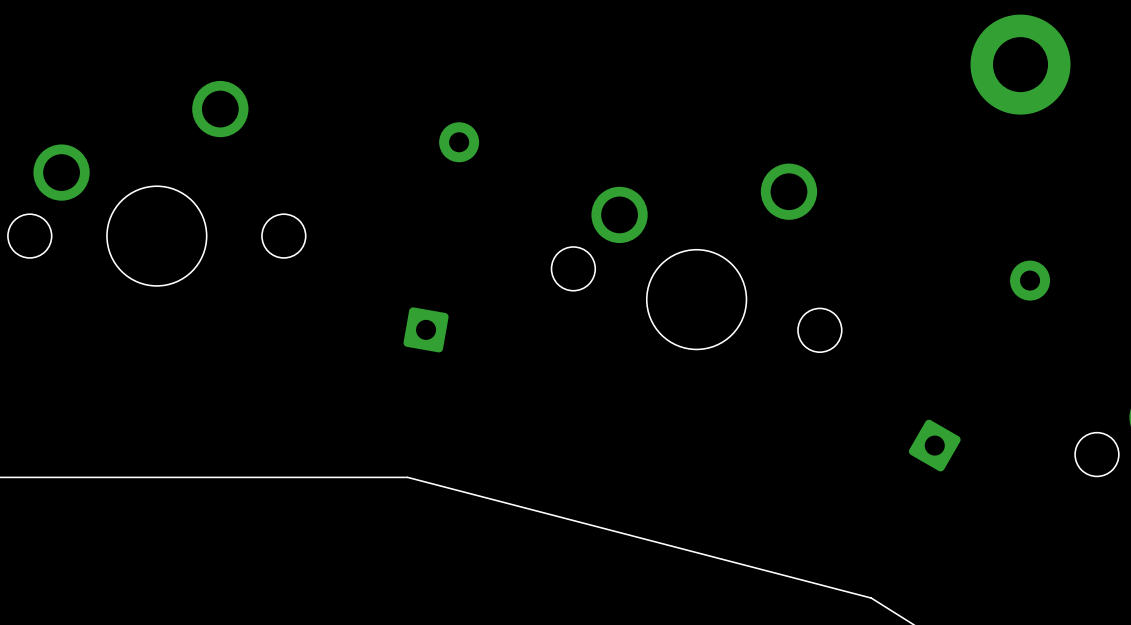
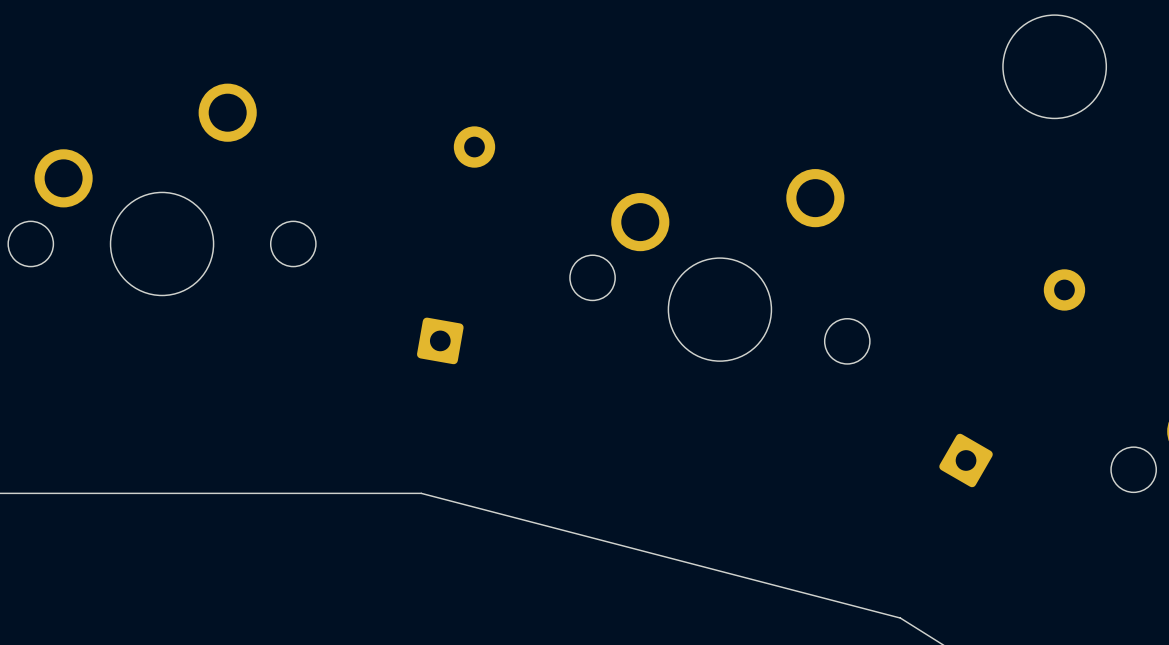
round board edge: none -> [1002, 14, 1107, 120]
part: (1020, 64) -> none

